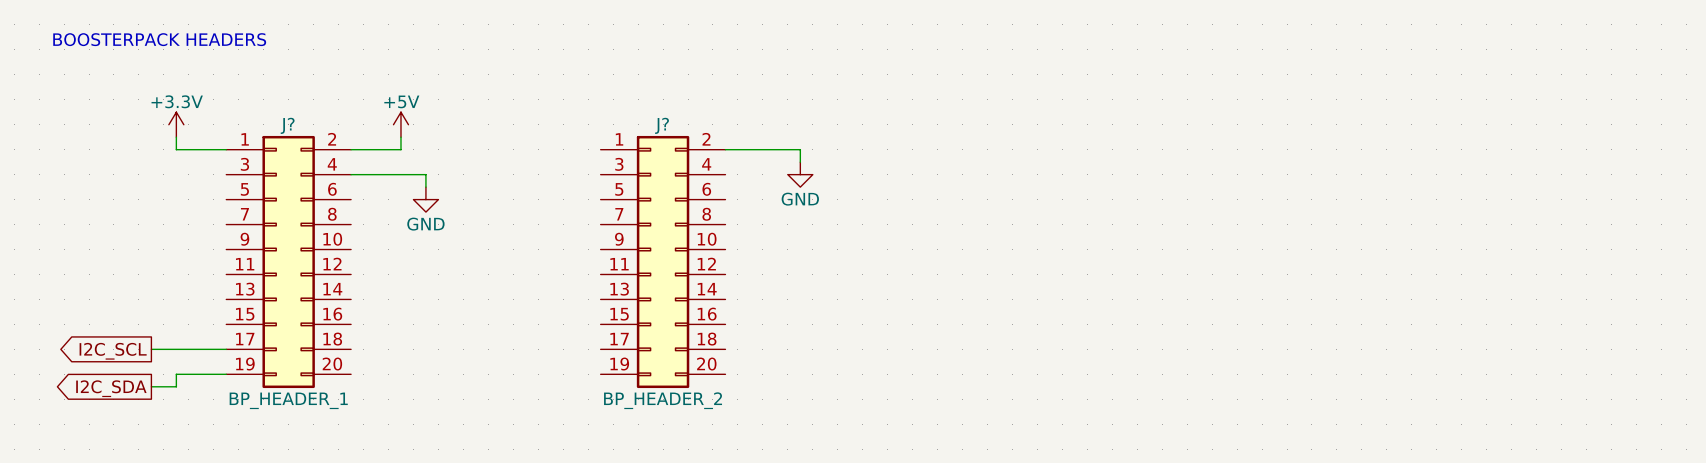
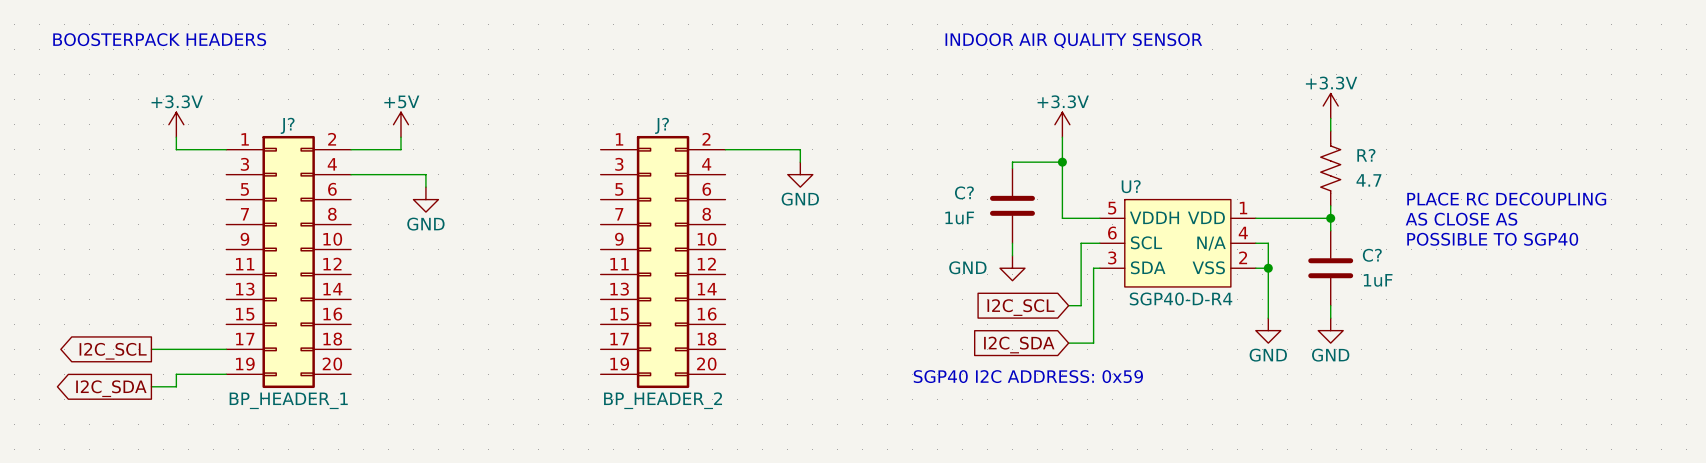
text: none -> INDOOR AIR QUALITY SENSOR (1073, 40)
power symbol: none -> +3.3V (1330, 106)
wire: none -> (1330, 118) (1330, 130)
power symbol: none -> +3.3V (1062, 124)
wire: none -> (1062, 137) (1062, 218) (1099, 218)
wire: none -> (1062, 162) (1012, 162) (1012, 168)
junction: none -> (1062, 162)
R?: none -> 4.7 (1330, 168)
text: none -> PLACE RC DECOUPLING (1506, 199)
C?: none -> 1uF (1012, 205)
wire: none -> (1330, 205) (1330, 230)
wire: none -> (1255, 218) (1330, 218)
junction: none -> (1330, 218)
text: none -> AS CLOSE AS (1461, 219)
text: none -> POSSIBLE TO SGP40 (1492, 239)
wire: none -> (1012, 243) (1012, 255)
wire: none -> (1099, 243) (1081, 243) (1081, 305) (1068, 305)
U?: none -> SGP40-D-R4 (1177, 243)
wire: none -> (1255, 243) (1268, 243) (1268, 318)
power symbol: none -> GND (1012, 268)
wire: none -> (1099, 268) (1093, 268) (1093, 343) (1068, 343)
wire: none -> (1255, 268) (1268, 268)
junction: none -> (1268, 268)
C?: none -> 1uF (1330, 268)
wire: none -> (1330, 305) (1330, 318)
global label: none -> I2C_SCL (1020, 307)
power symbol: none -> GND (1268, 330)
power symbol: none -> GND (1330, 330)
global label: none -> I2C_SDA (1019, 345)
text: none -> SGP40 I2C ADDRESS: 0x59 (1028, 376)

